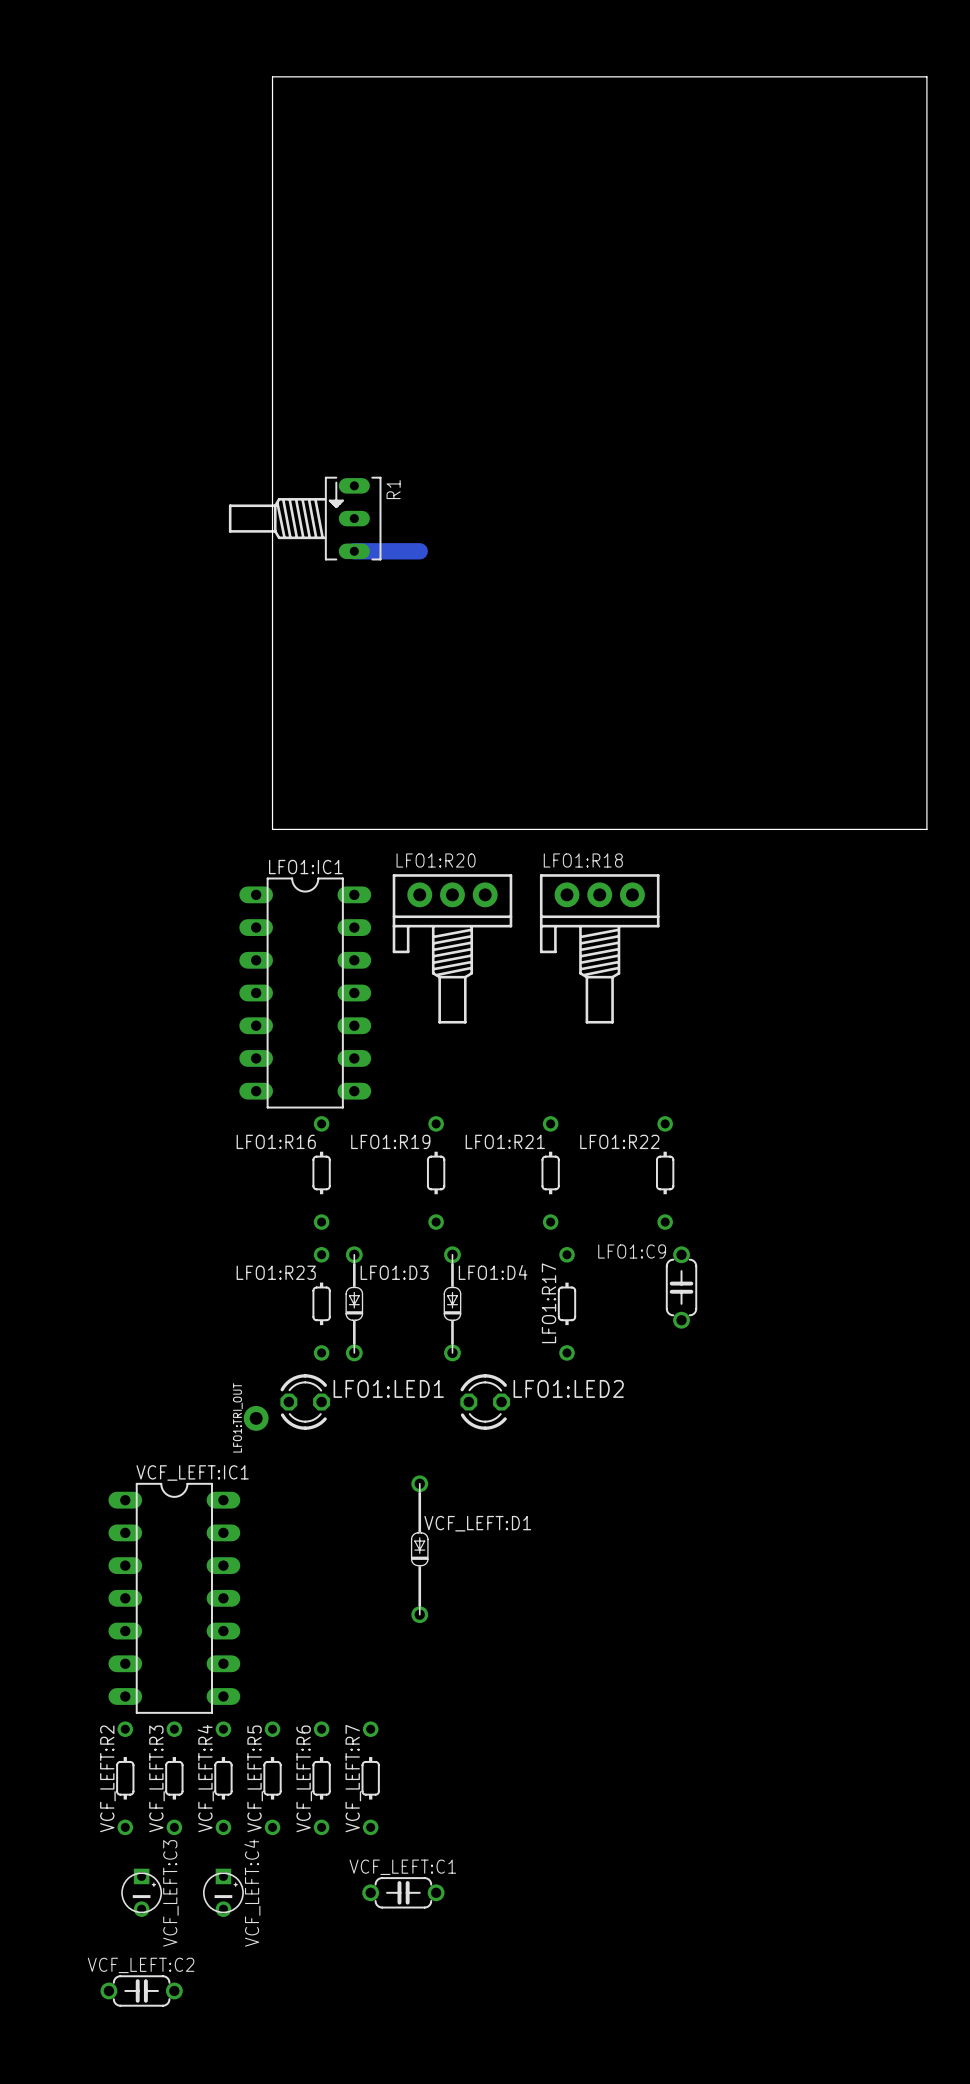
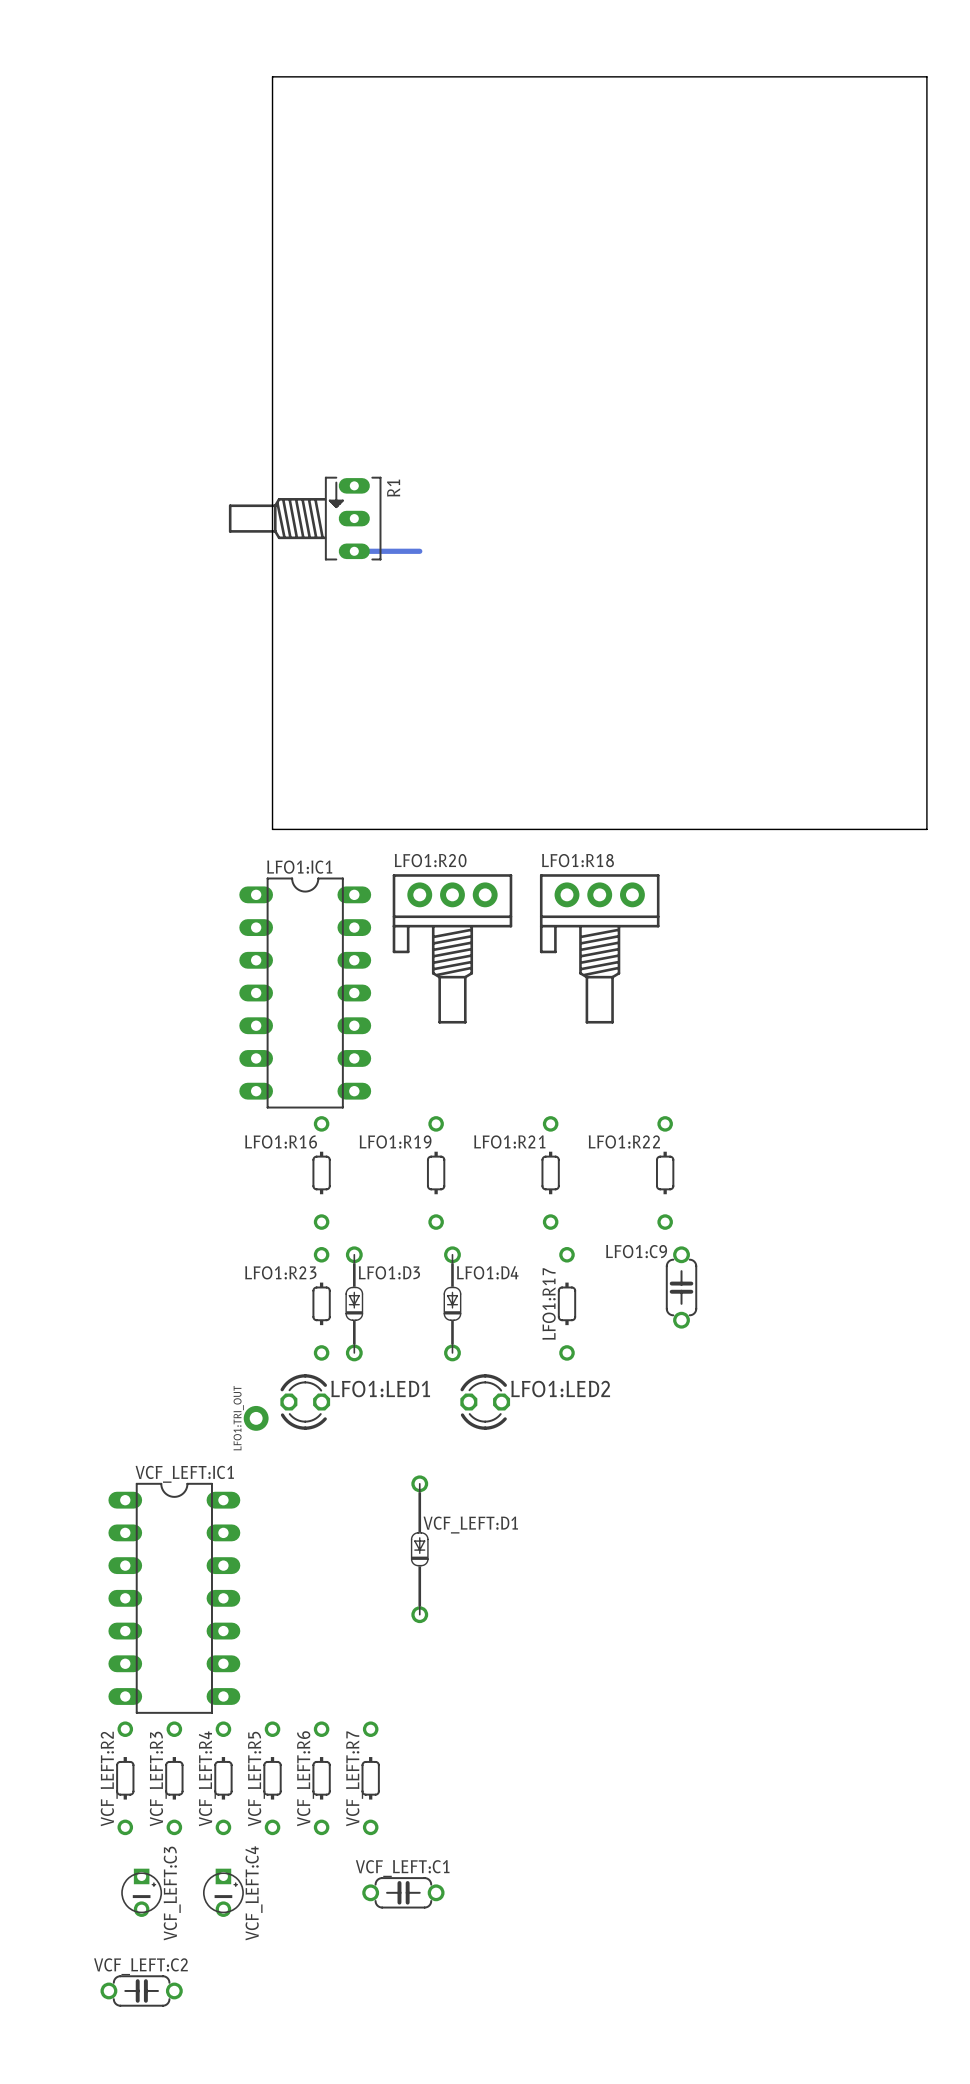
bottom track width: thick (354, 551) (419, 551) -> thin (354, 551) (419, 551)

